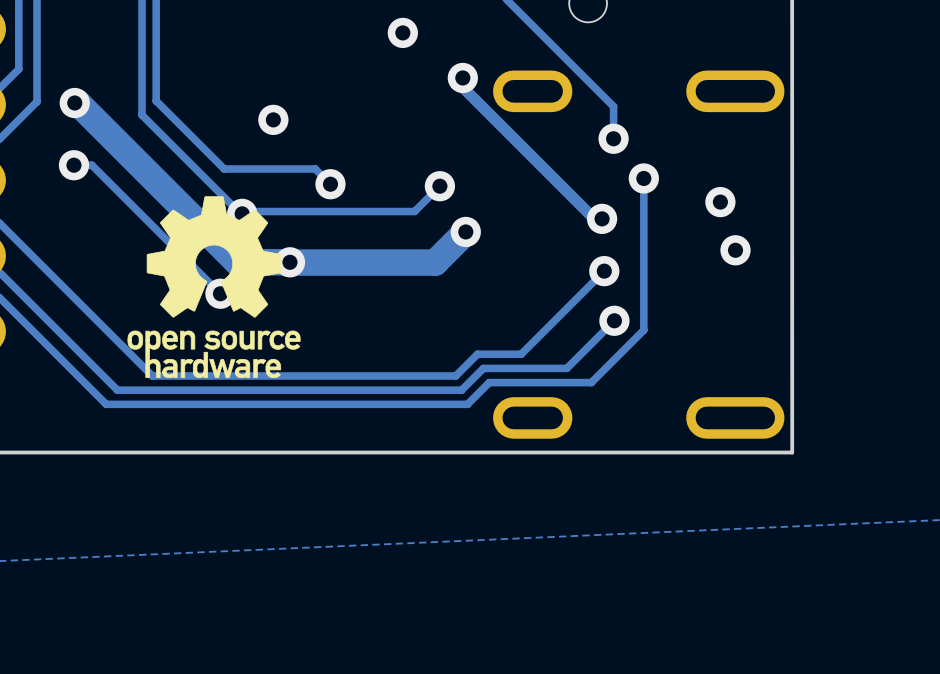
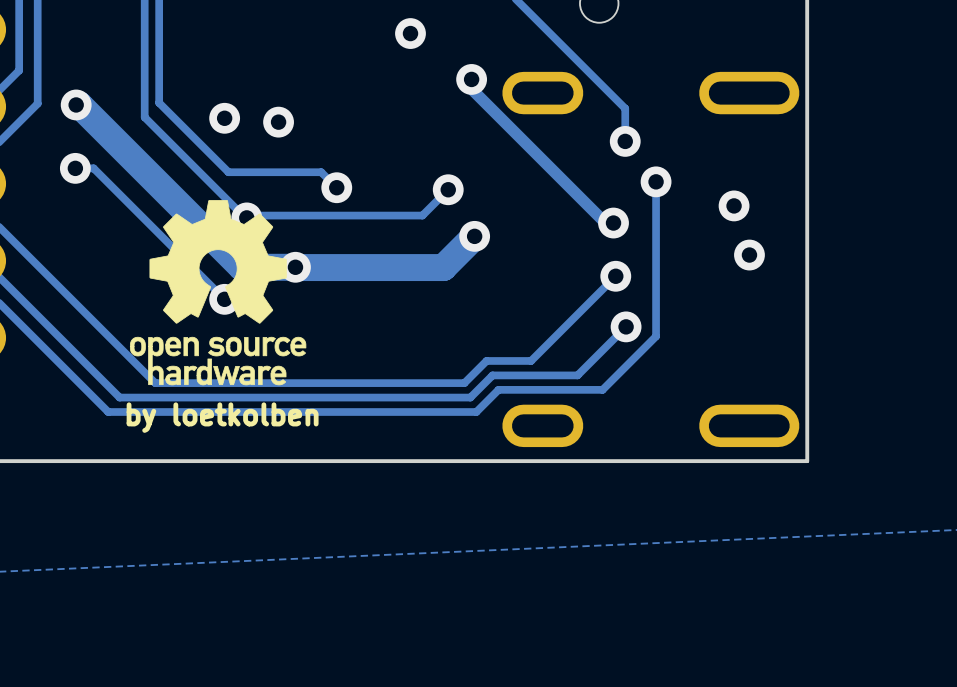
via: none -> (224, 118)
text: none -> by loetkolben (222, 417)

